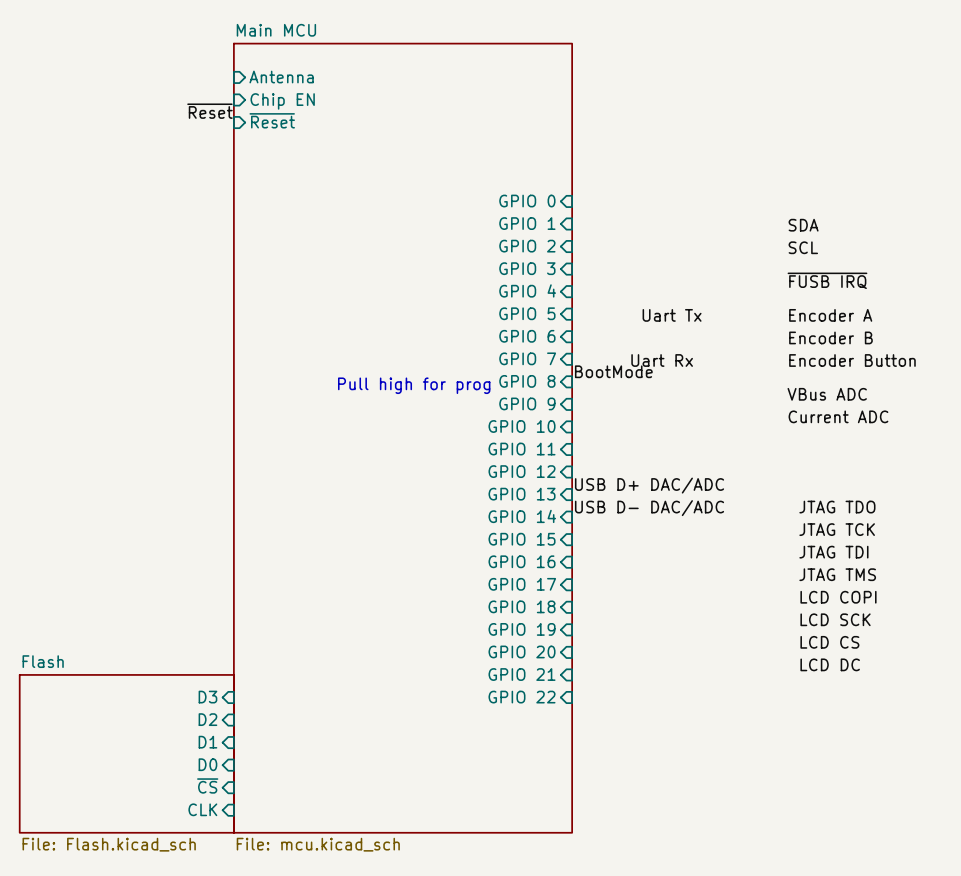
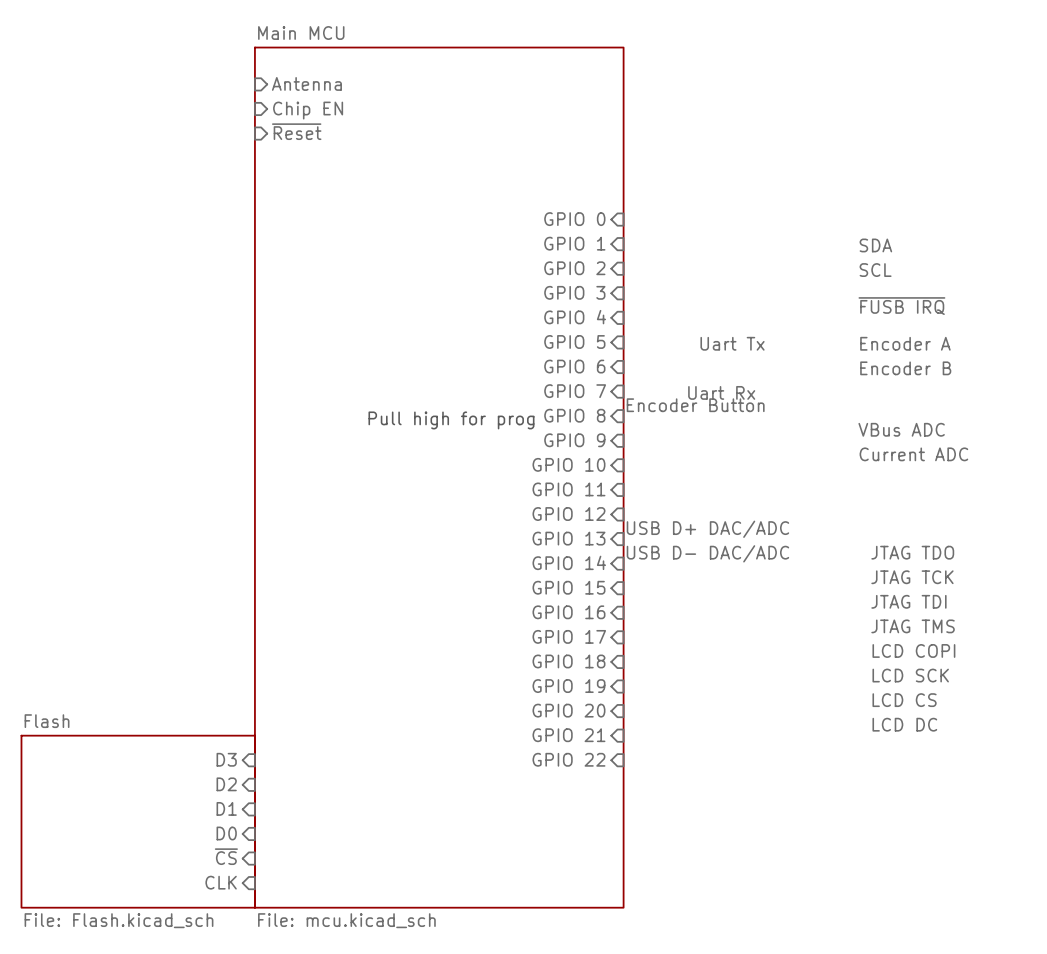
label: ~{Reset} (209, 111) -> none
label: Encoder Button (852, 360) -> none
label: BootMode (613, 371) -> Encoder Button (695, 405)

